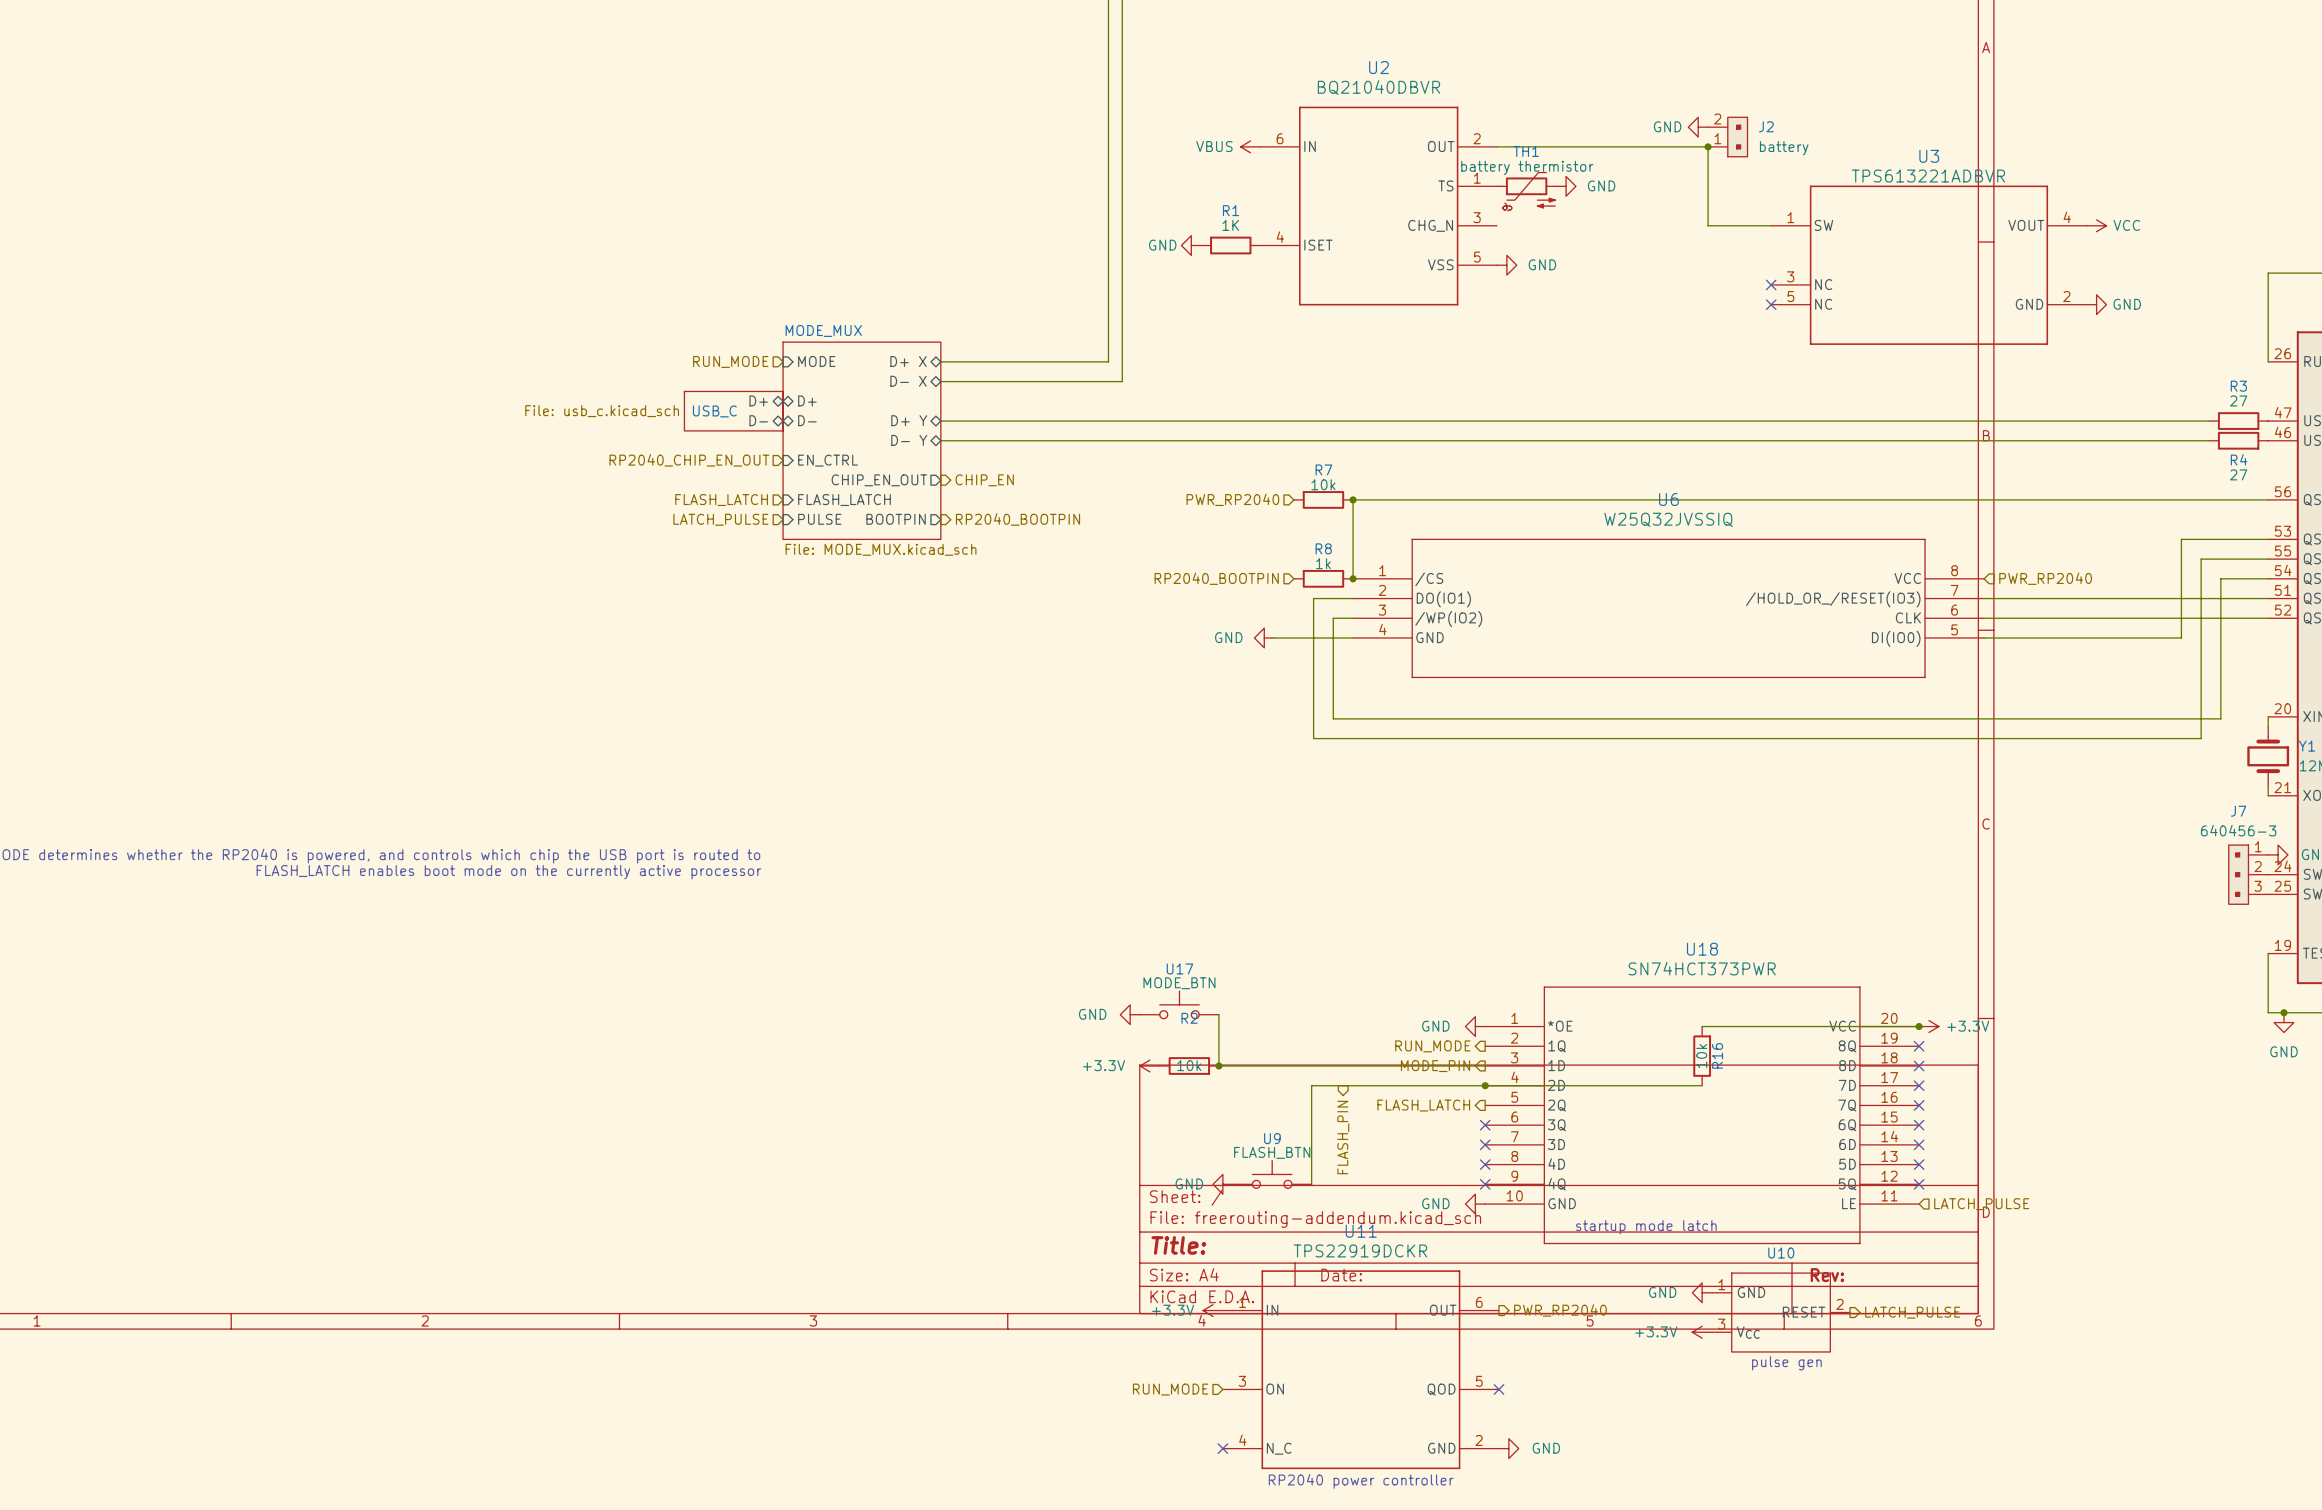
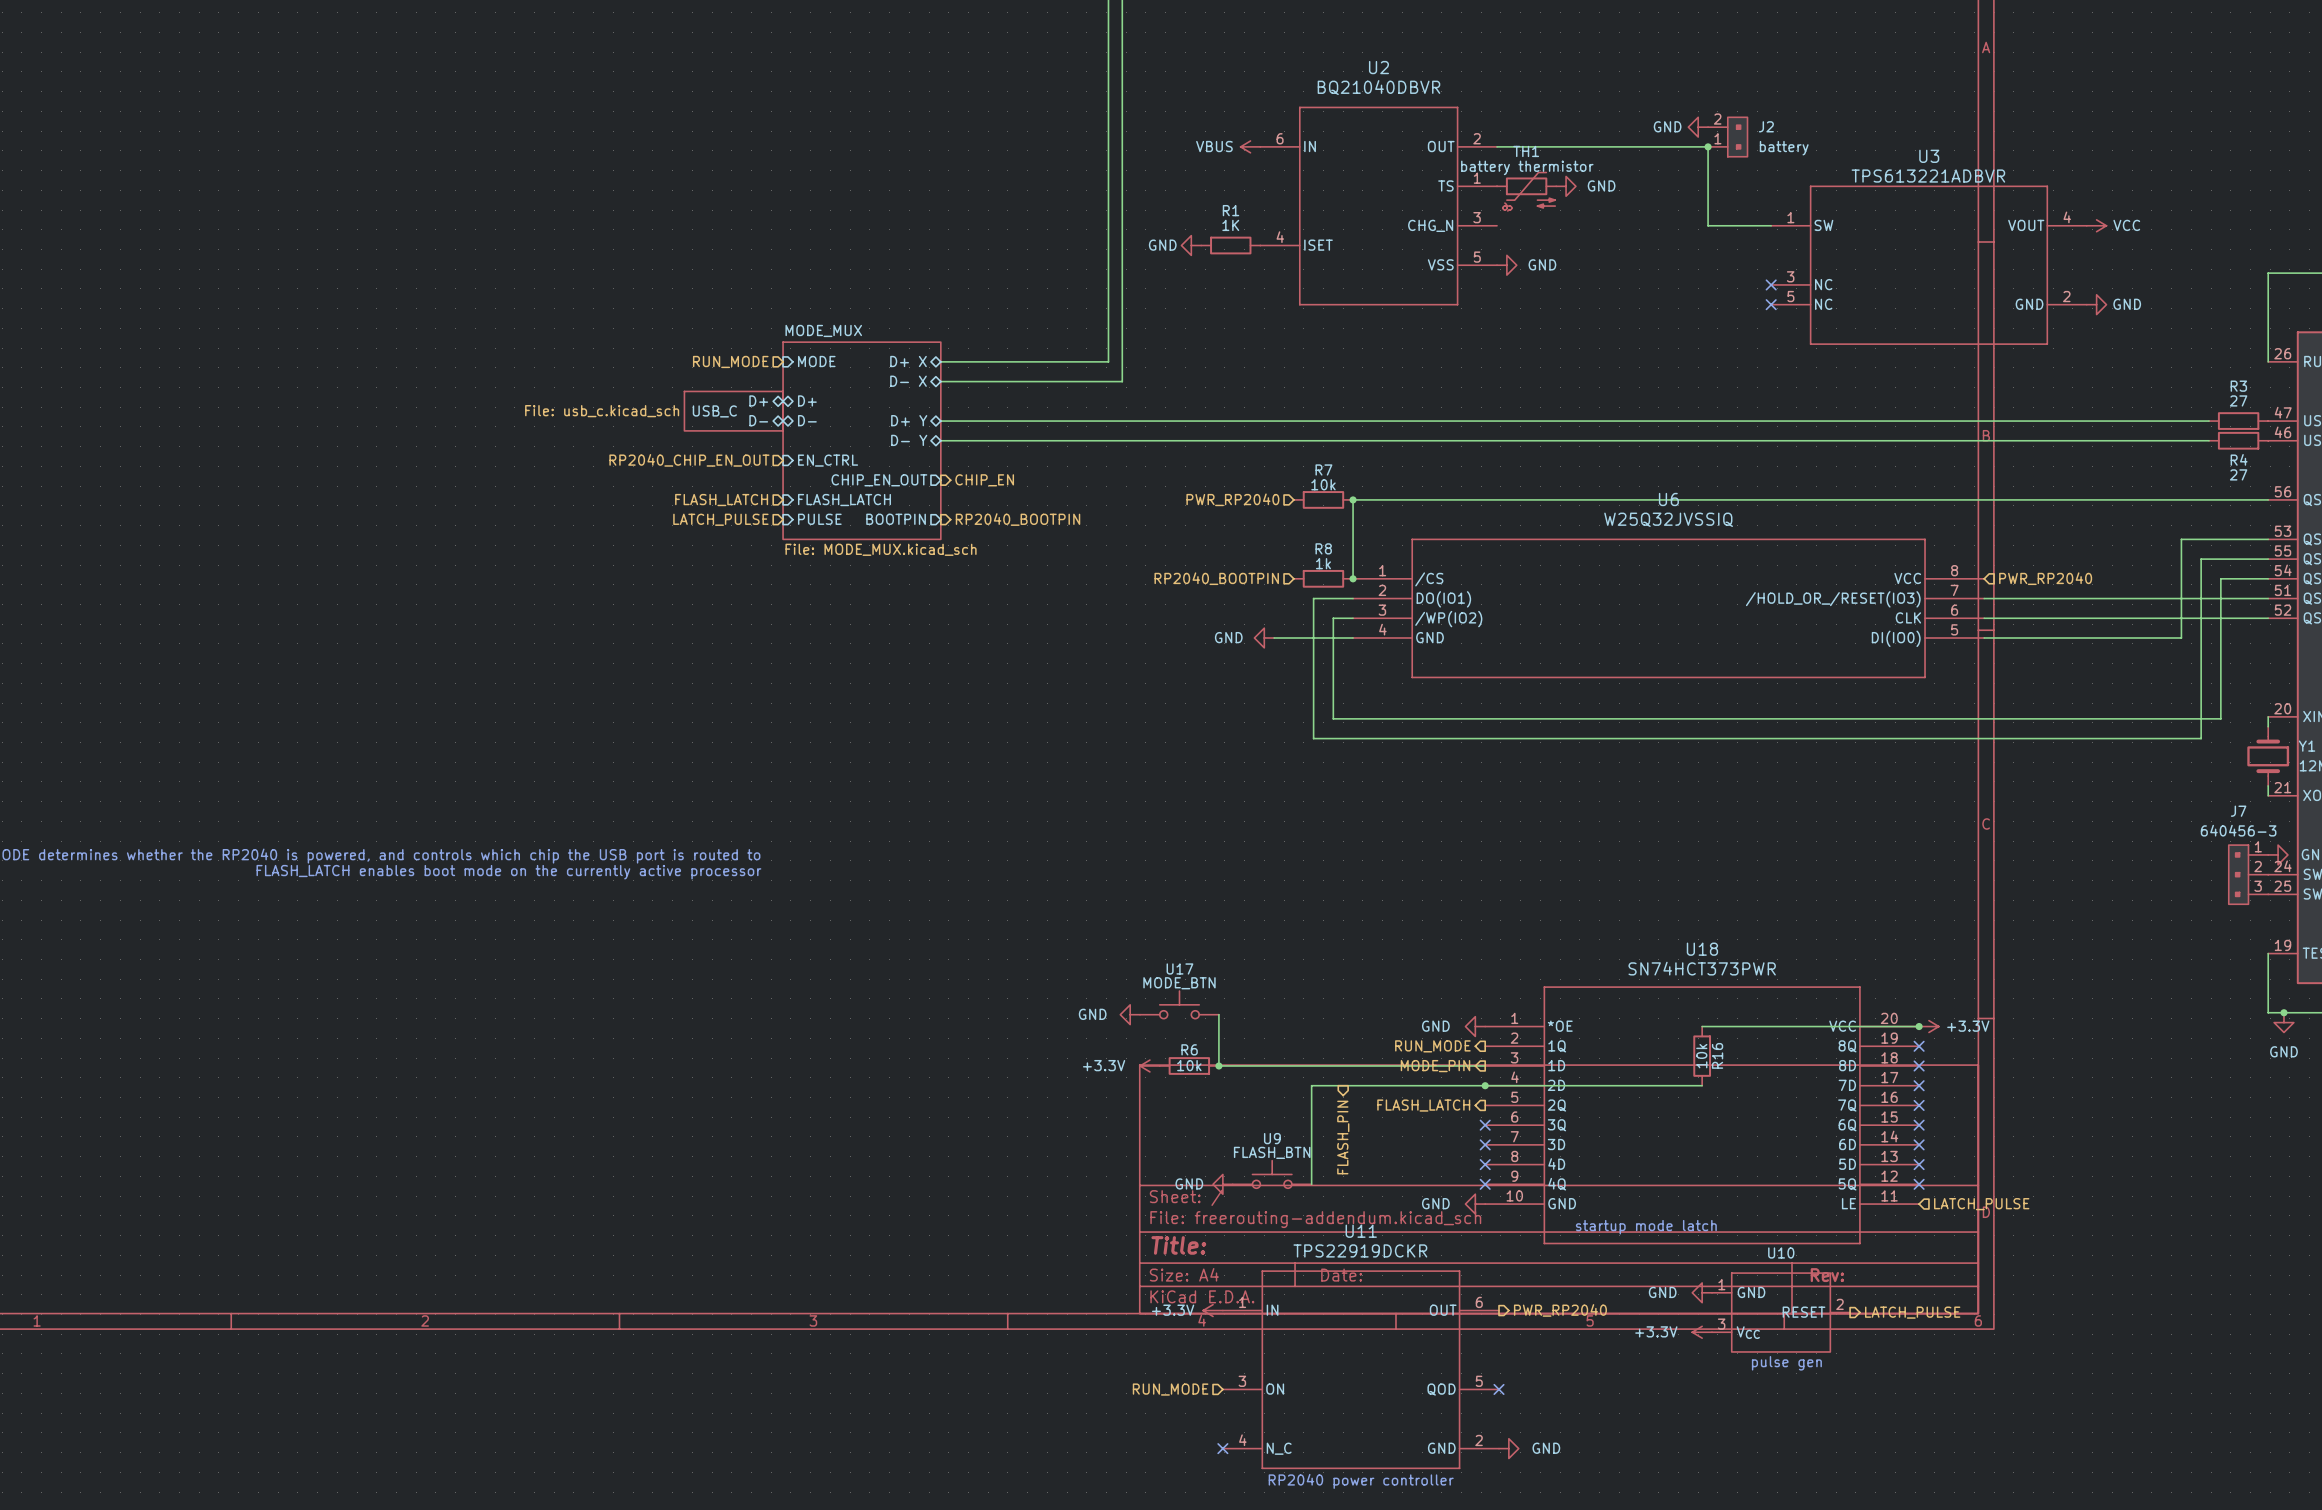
R2 name: R2 (1189, 1018) -> R6 (1189, 1049)

